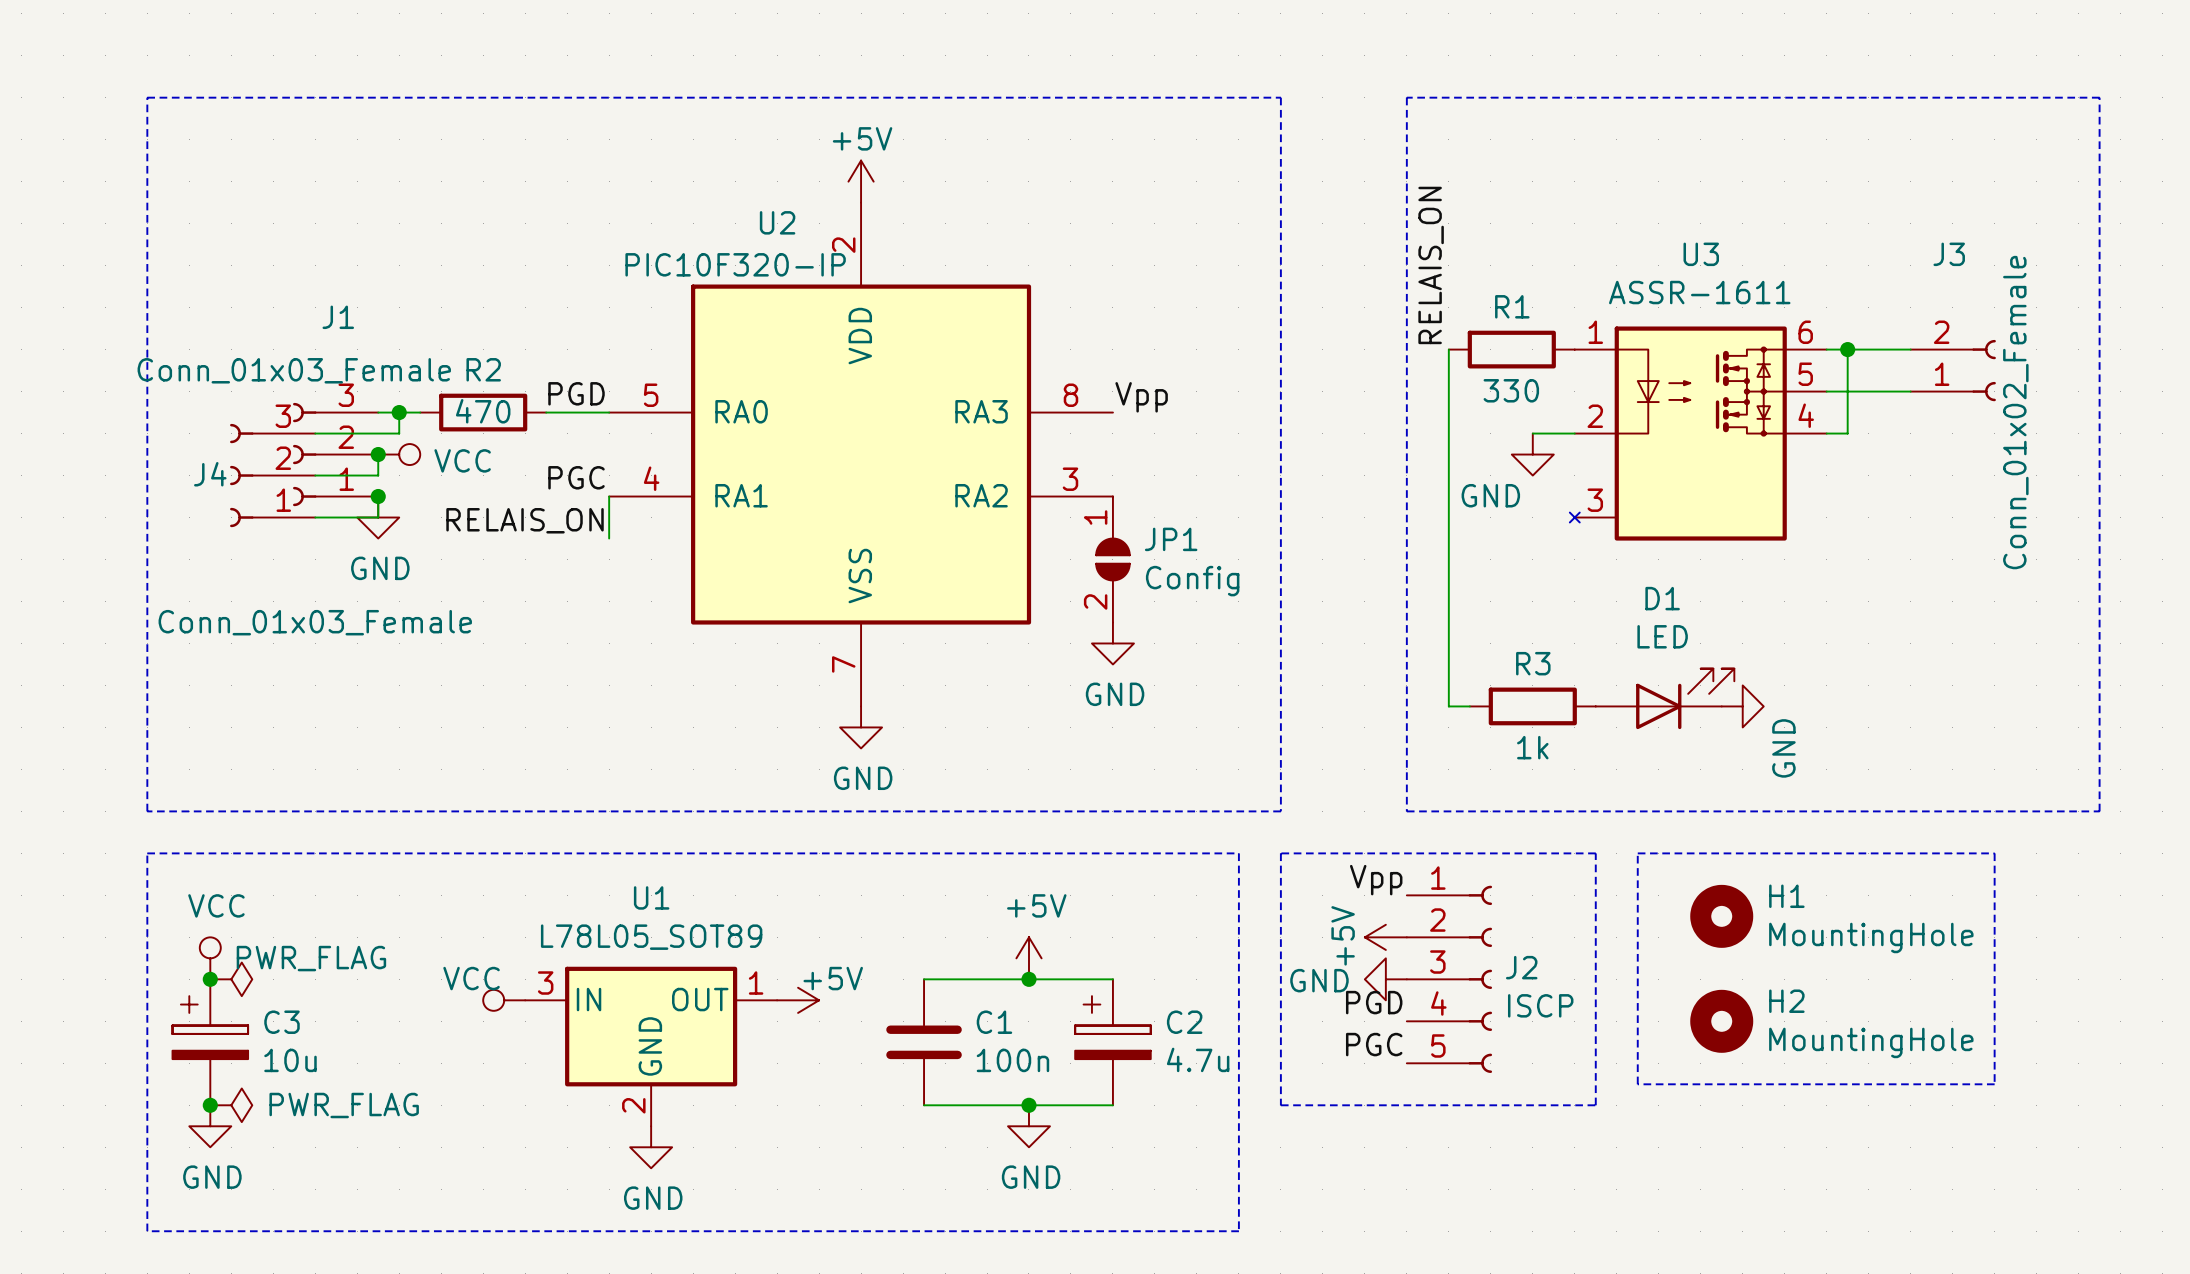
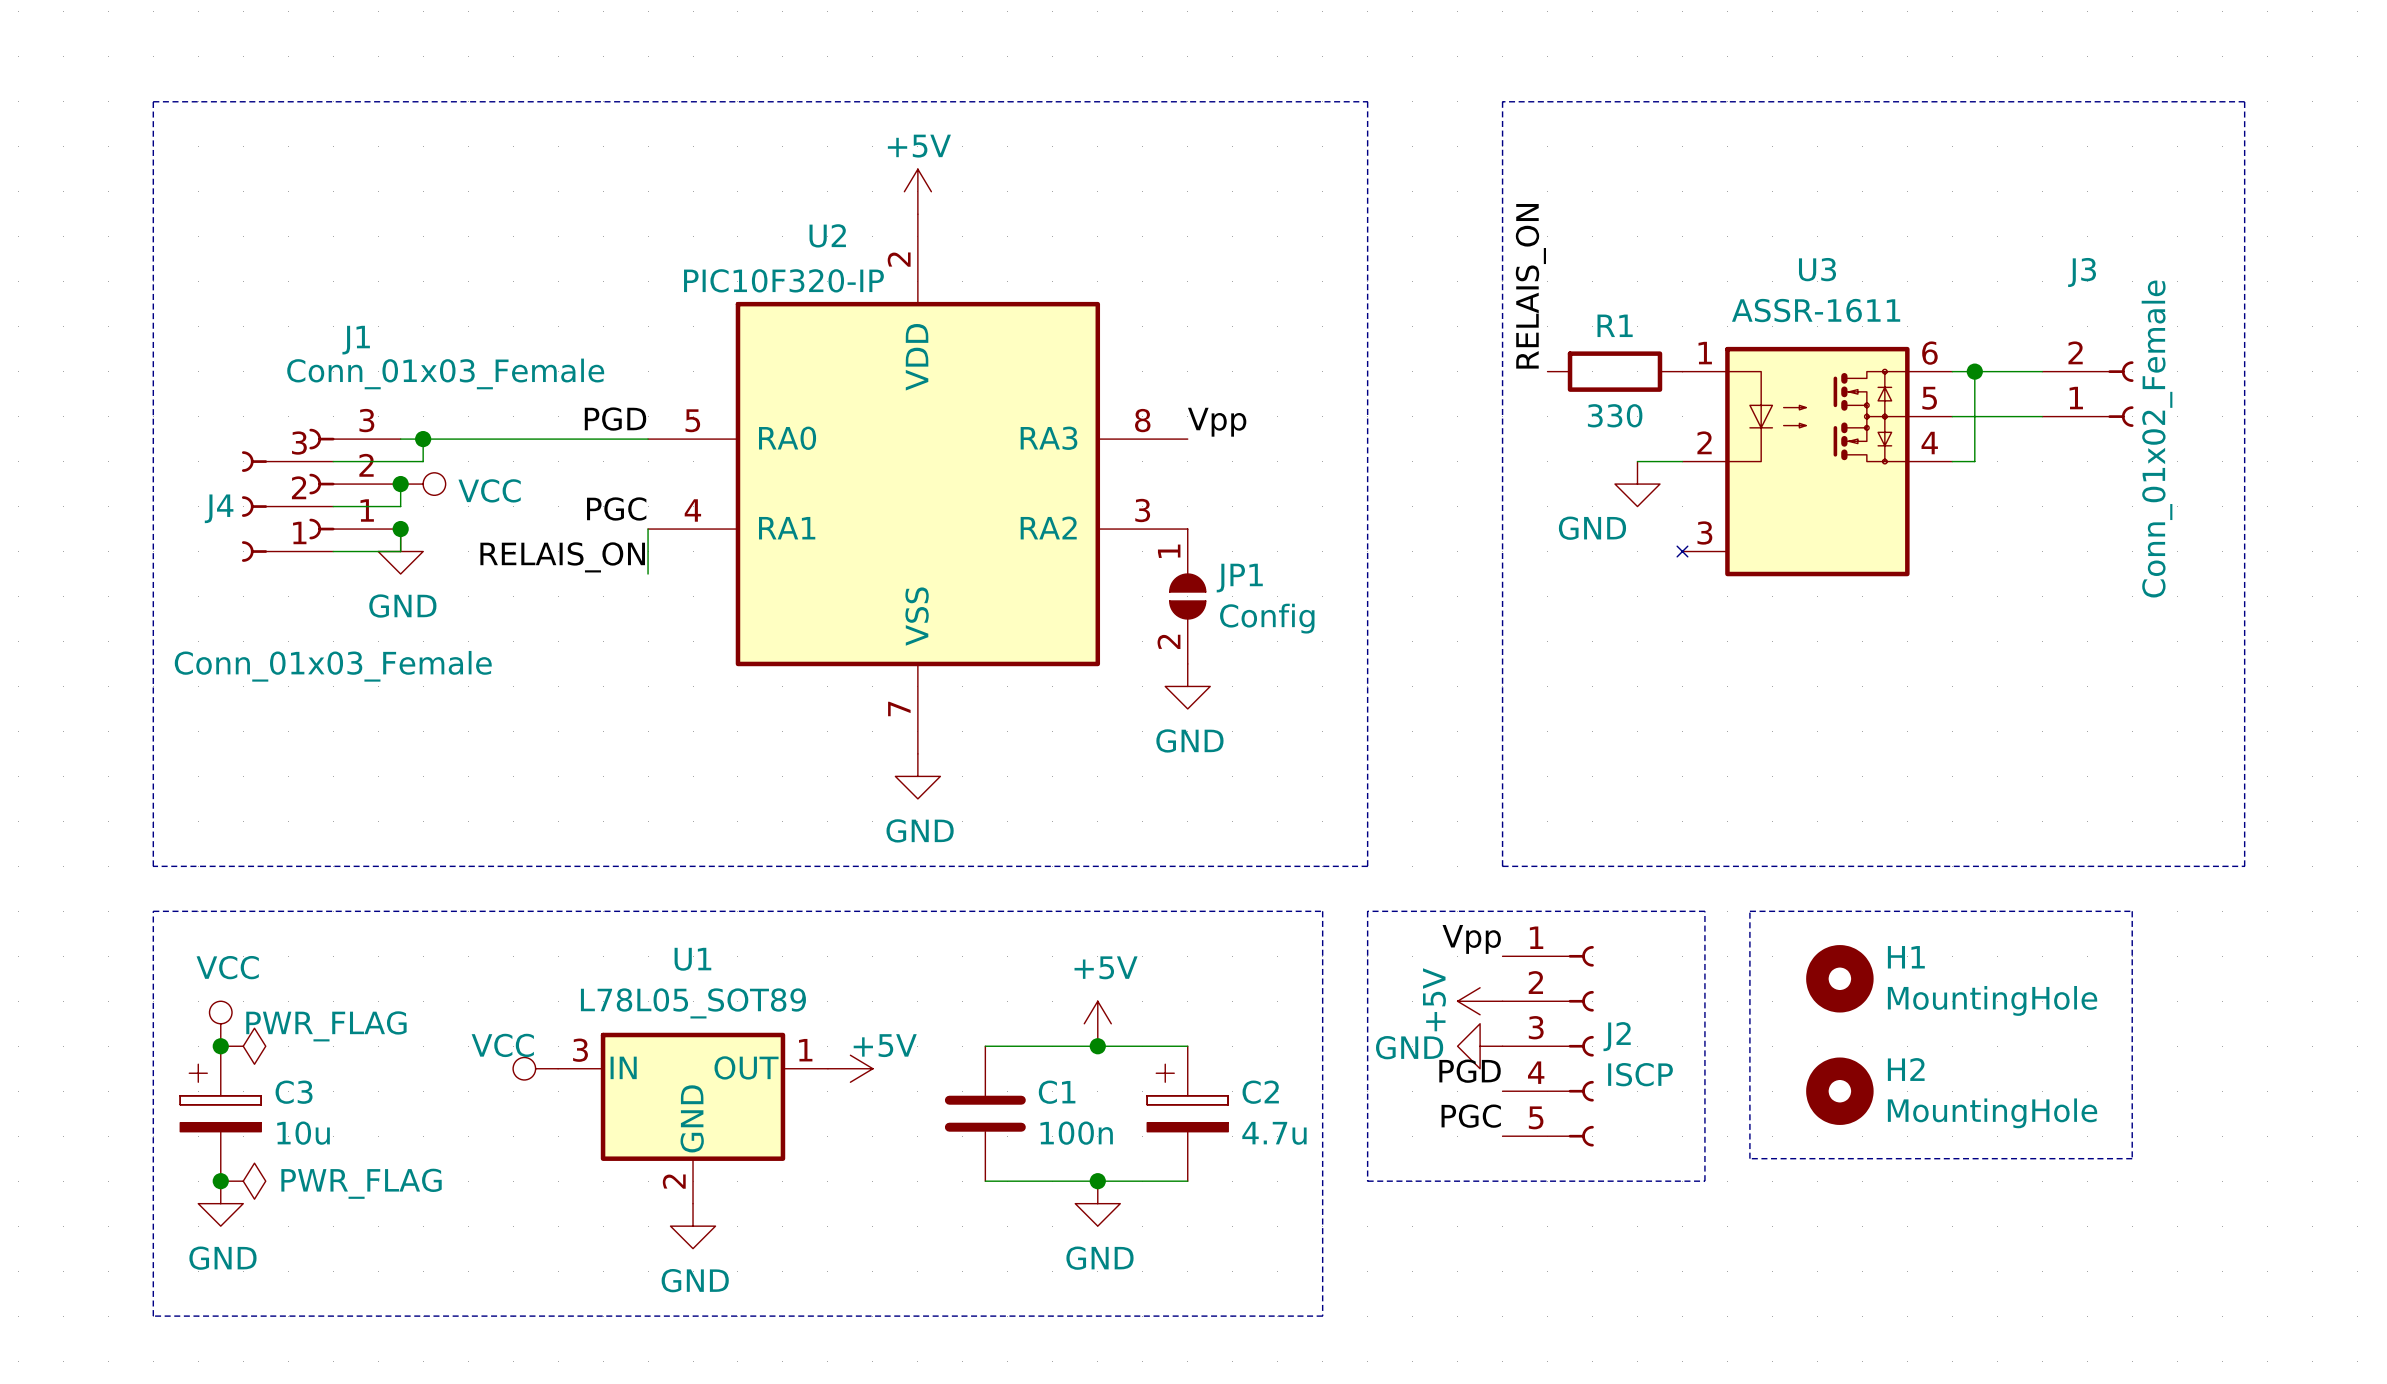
wire: (1448, 349) (1448, 706) (1469, 706) -> none
J1 value position: Conn_01x03_Female (294, 370) -> Conn_01x03_Female (445, 373)
wire: none -> (445, 439) (580, 439)
R2: 470 (483, 412) -> none
D1: LED (1665, 698) -> none
R3: 1k (1532, 706) -> none
power symbol: GND (1742, 706) -> none

